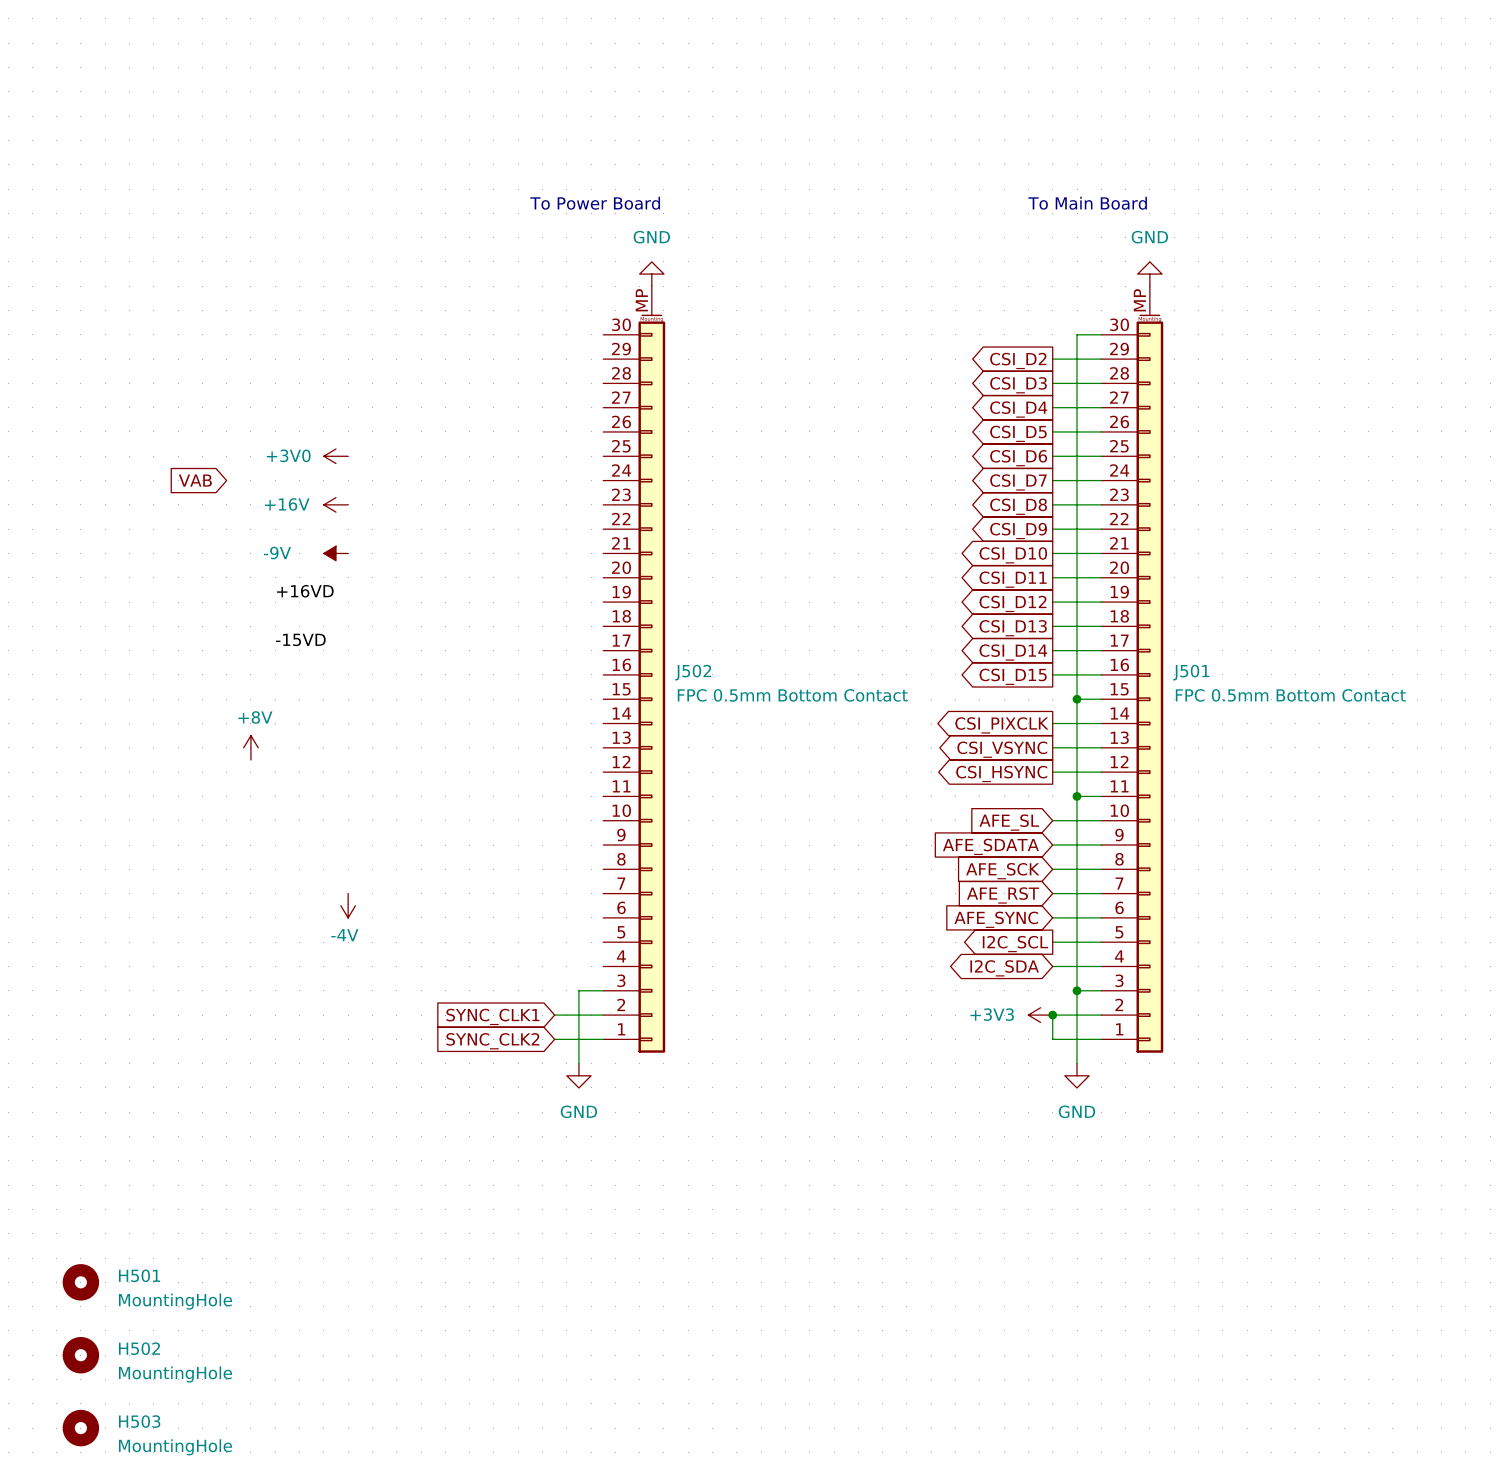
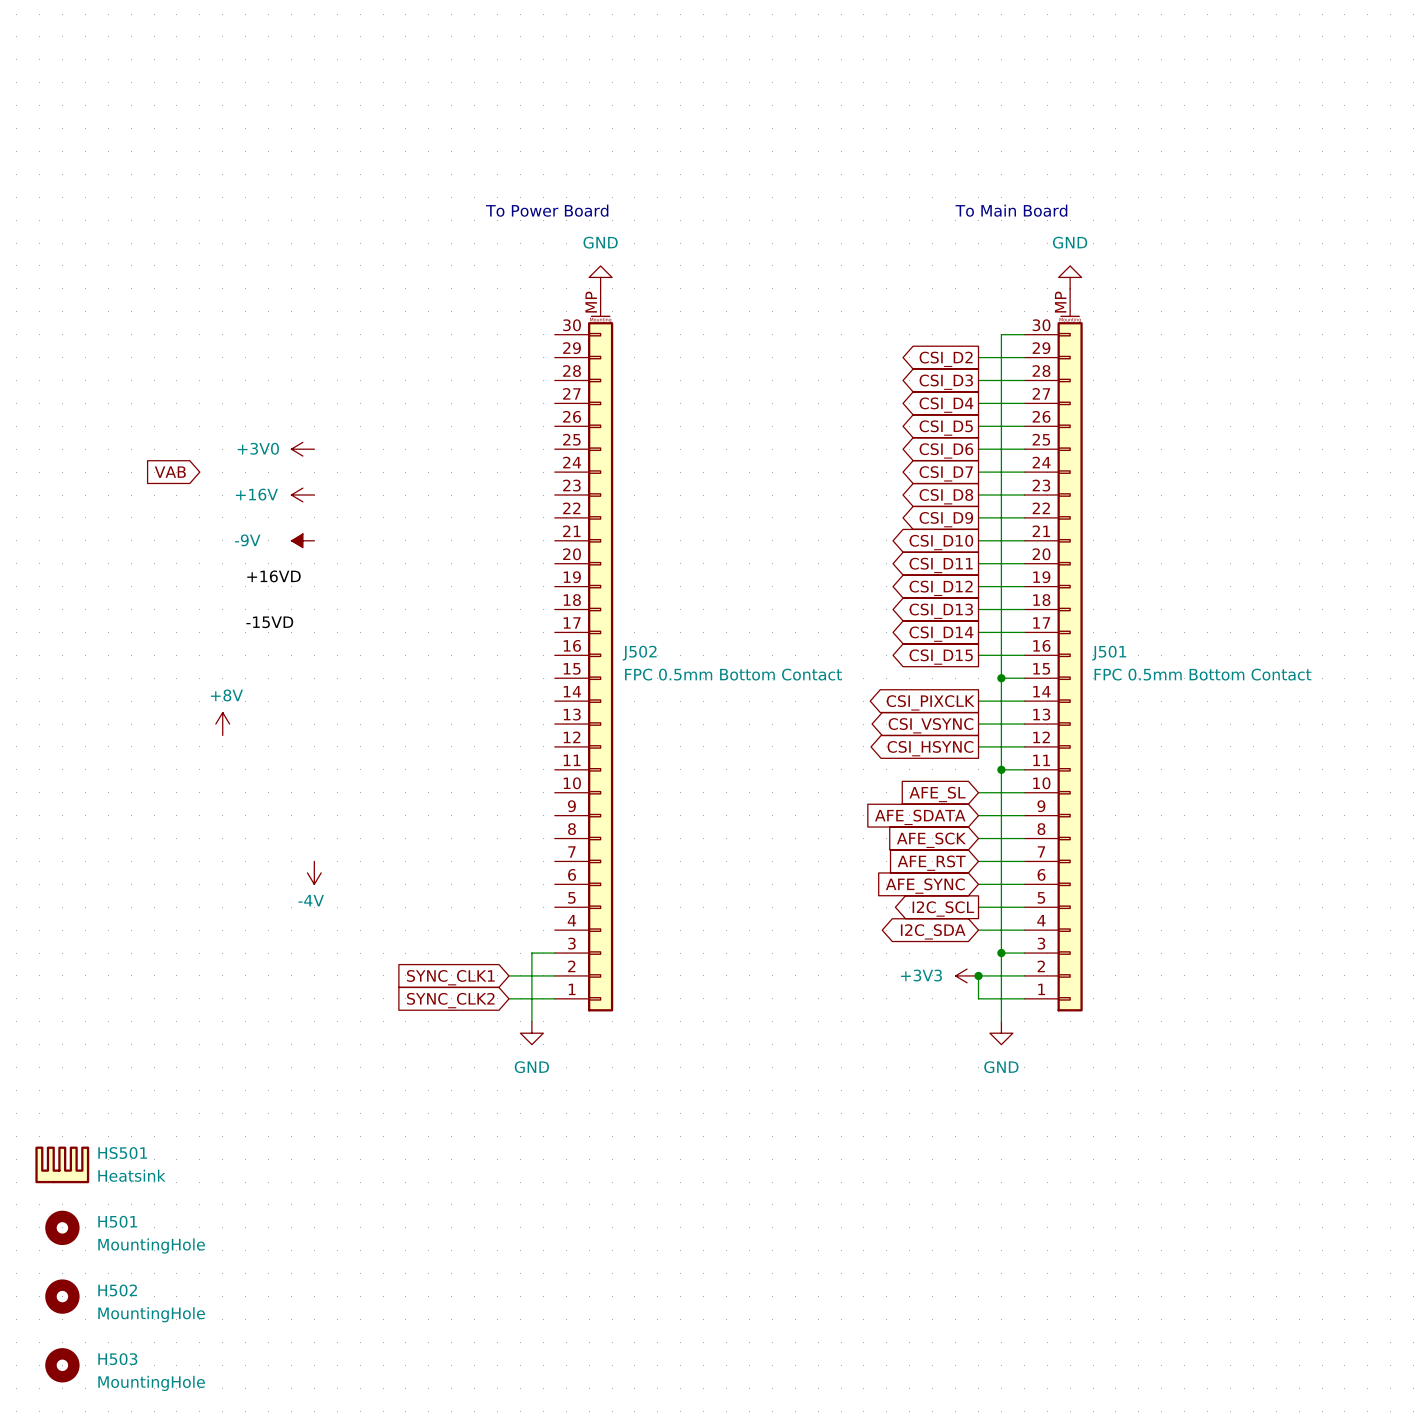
HS501: none -> Heatsink (62, 1164)

